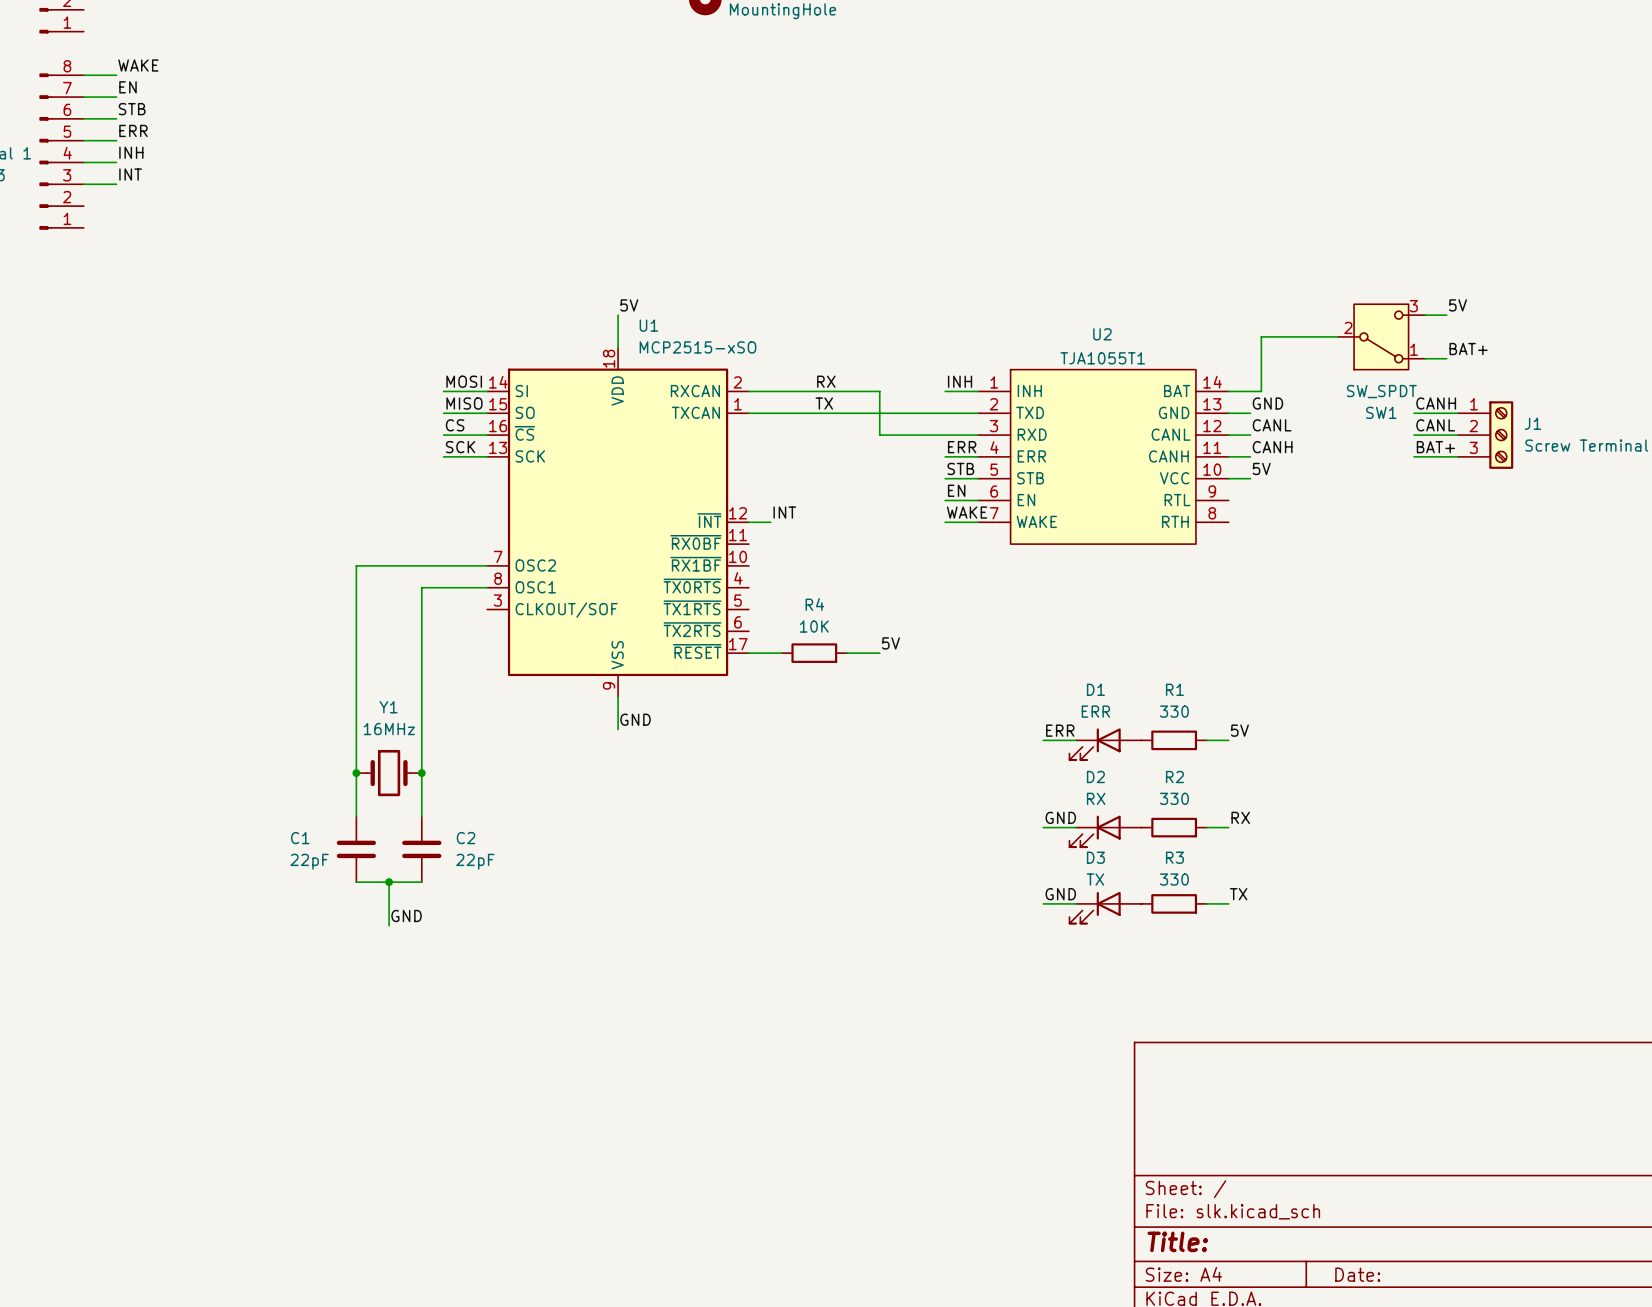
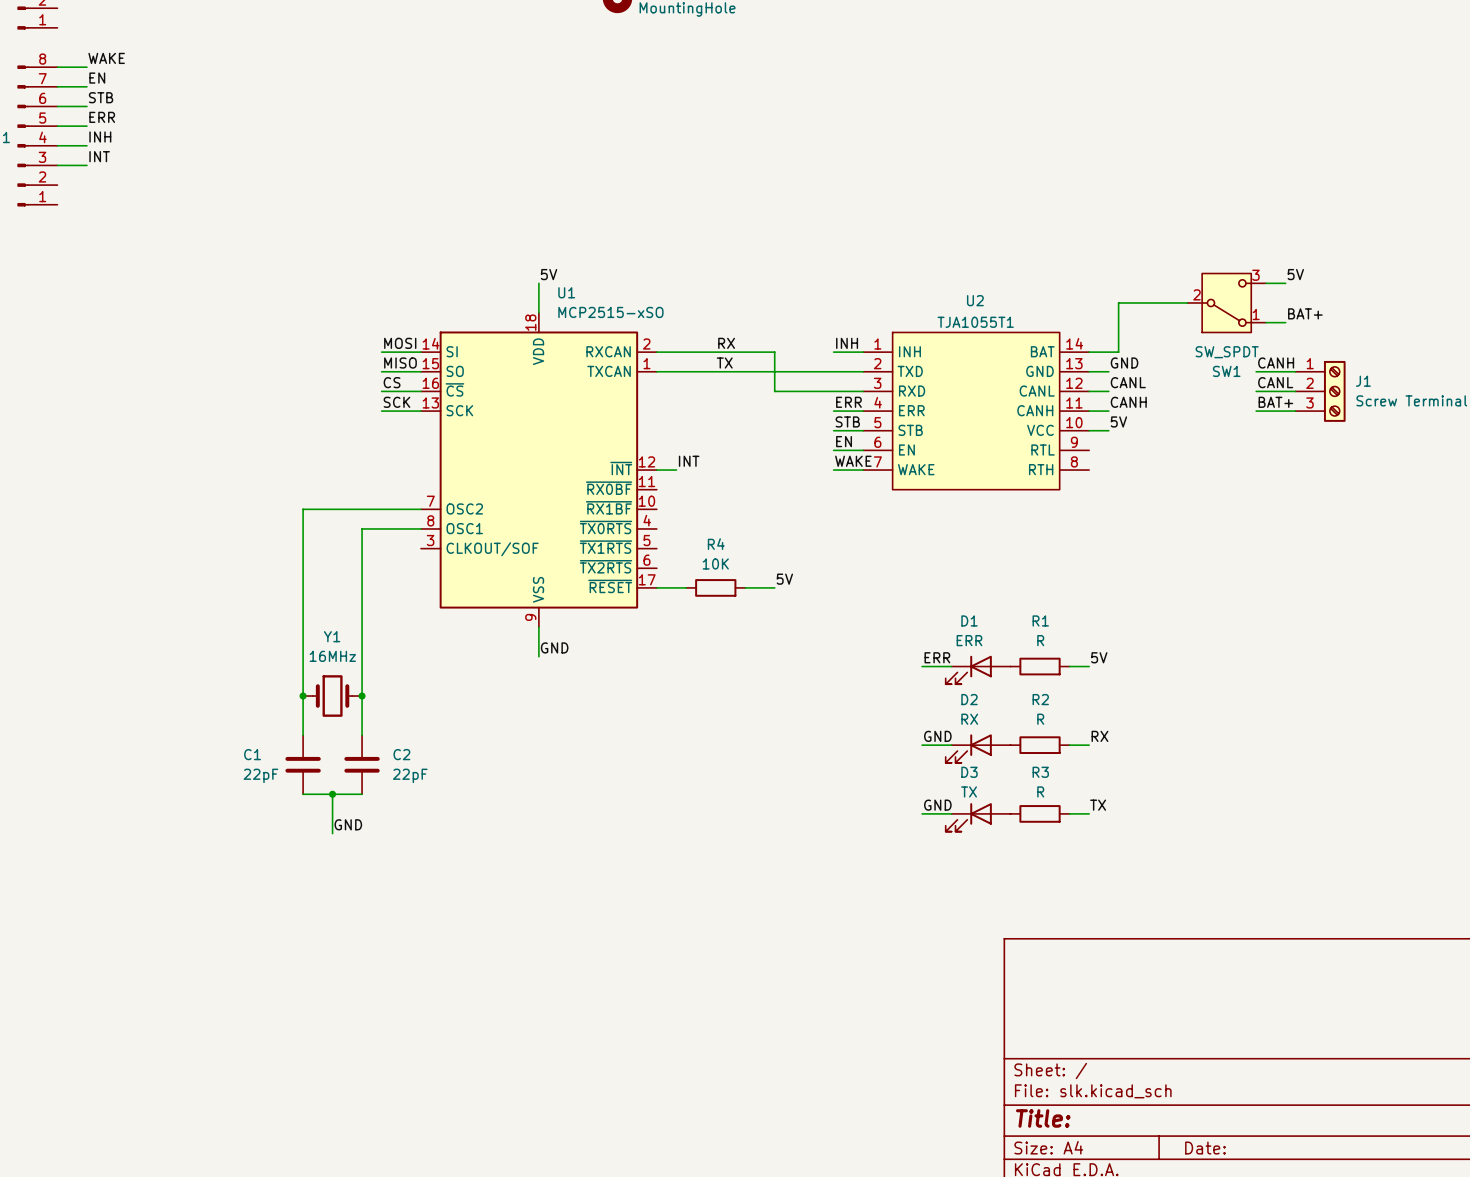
R1 value: 330 (1174, 711) -> R (1040, 640)
R2 value: 330 (1174, 798) -> R (1040, 719)
R3 value: 330 (1174, 879) -> R (1040, 791)

